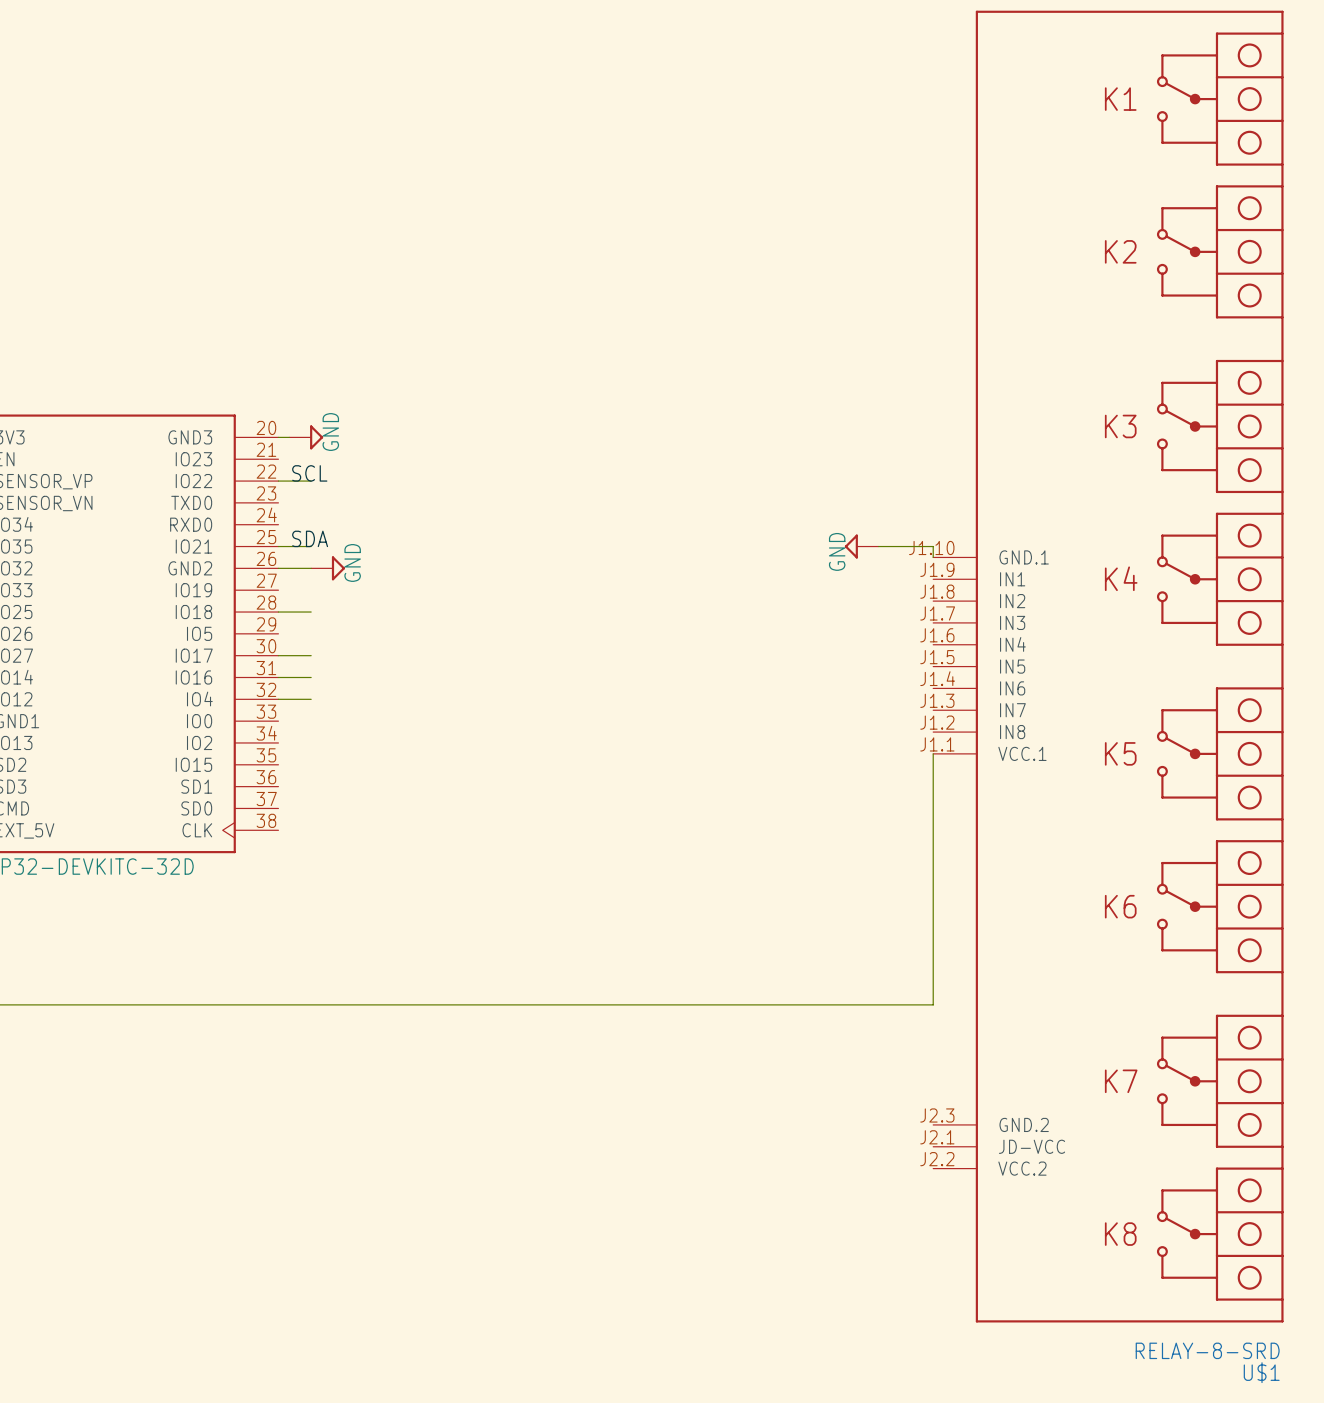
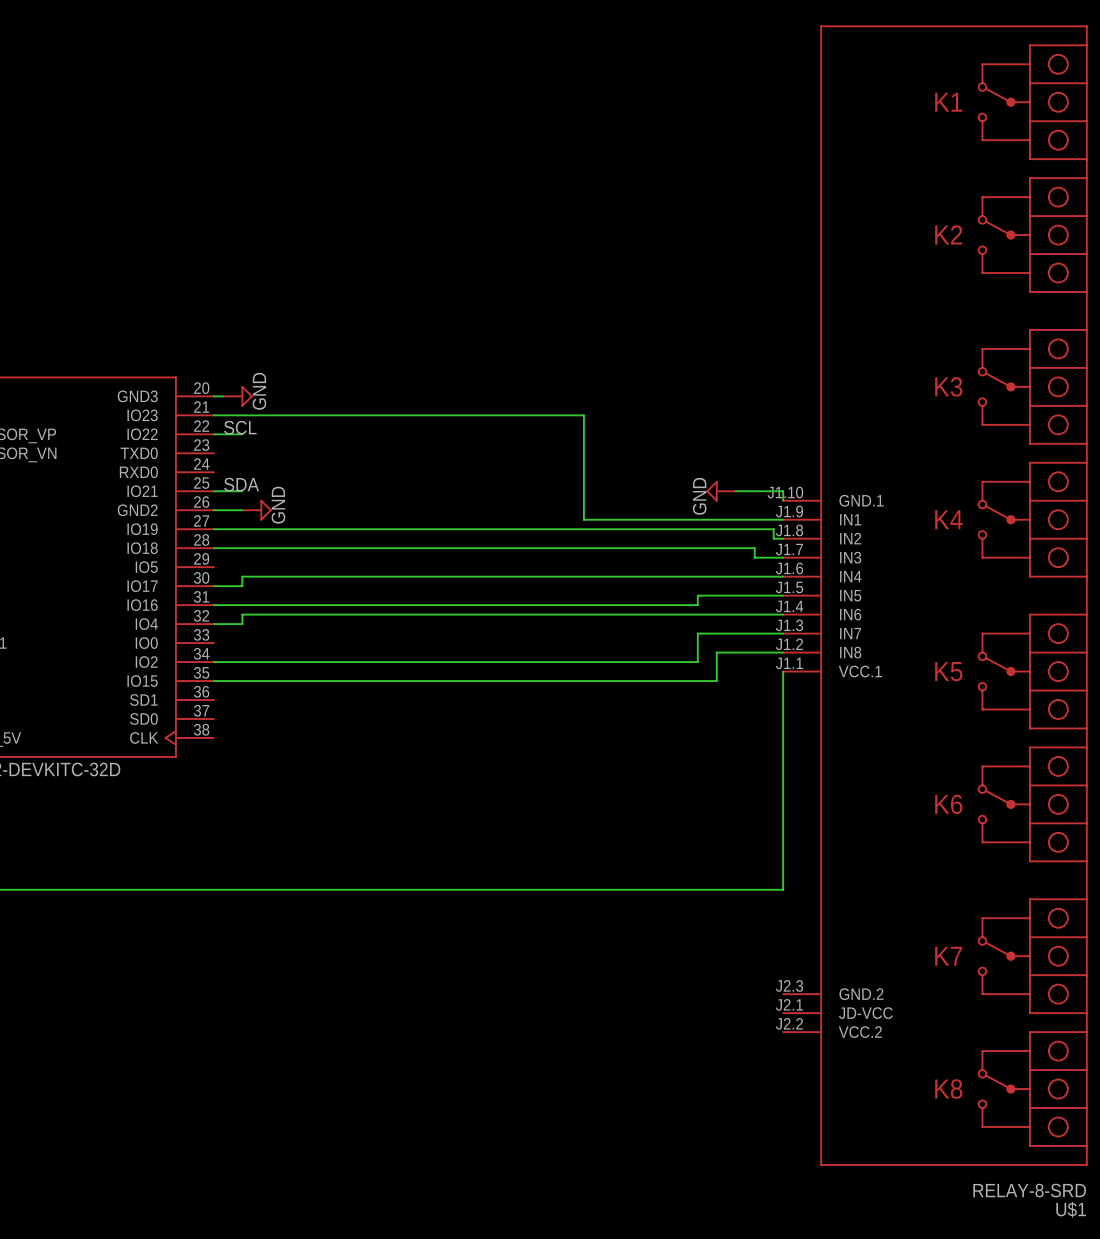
wire: none -> (213, 415) (583, 415) (583, 519) (783, 519)
wire: none -> (213, 529) (773, 529) (773, 538) (783, 538)
wire: none -> (242, 548) (754, 548) (754, 557) (783, 557)
wire: none -> (783, 576) (242, 576) (242, 586)
wire: none -> (783, 595) (697, 595) (697, 605) (242, 605)
wire: none -> (783, 614) (242, 614) (242, 624)
wire: none -> (783, 633) (697, 633) (697, 662) (213, 662)
wire: none -> (783, 652) (716, 652) (716, 681) (213, 681)

